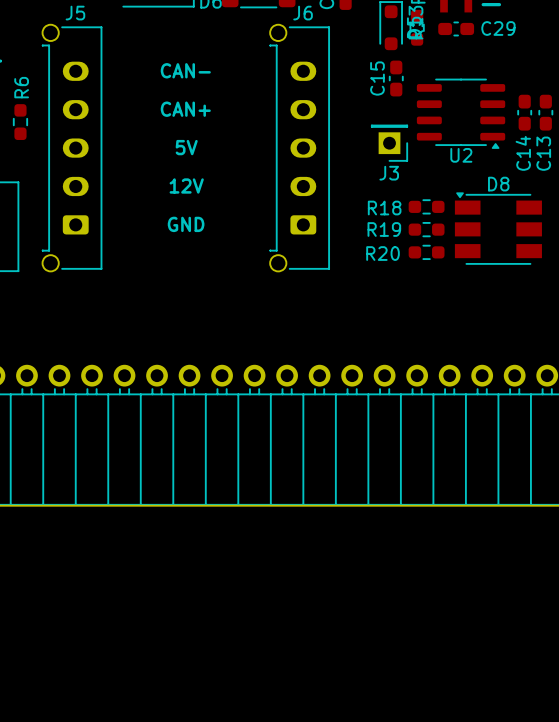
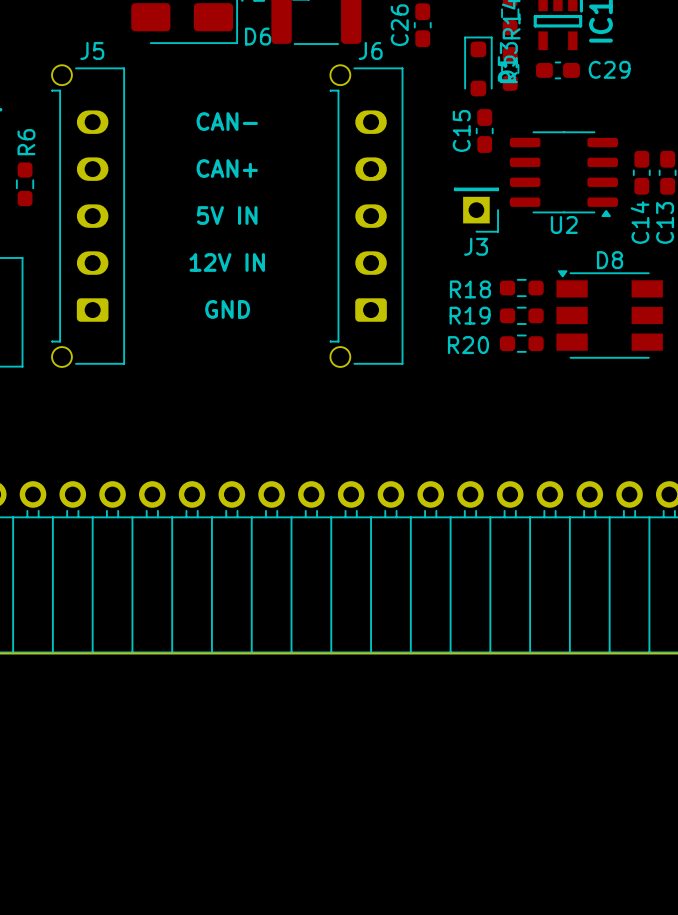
text: 5V (186, 147) -> 5V IN (227, 215)
text: 12V (186, 186) -> 12V IN (227, 262)

